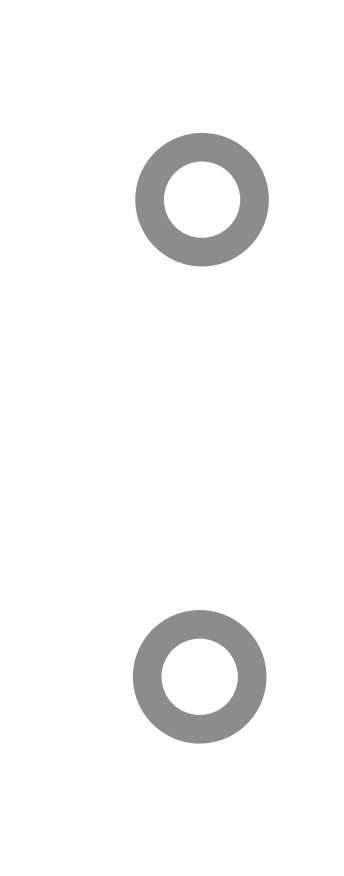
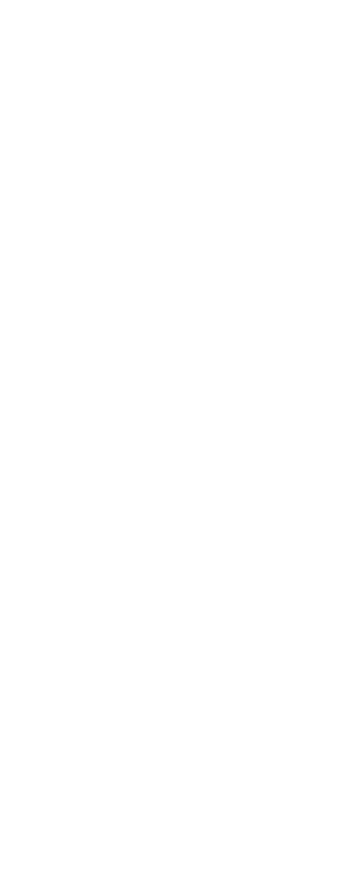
part: (202, 199) -> none
part: (199, 676) -> none

